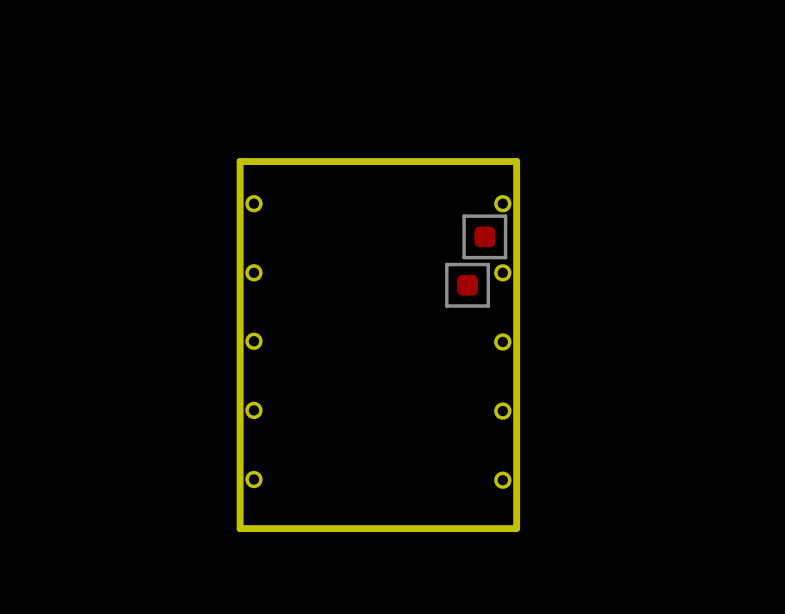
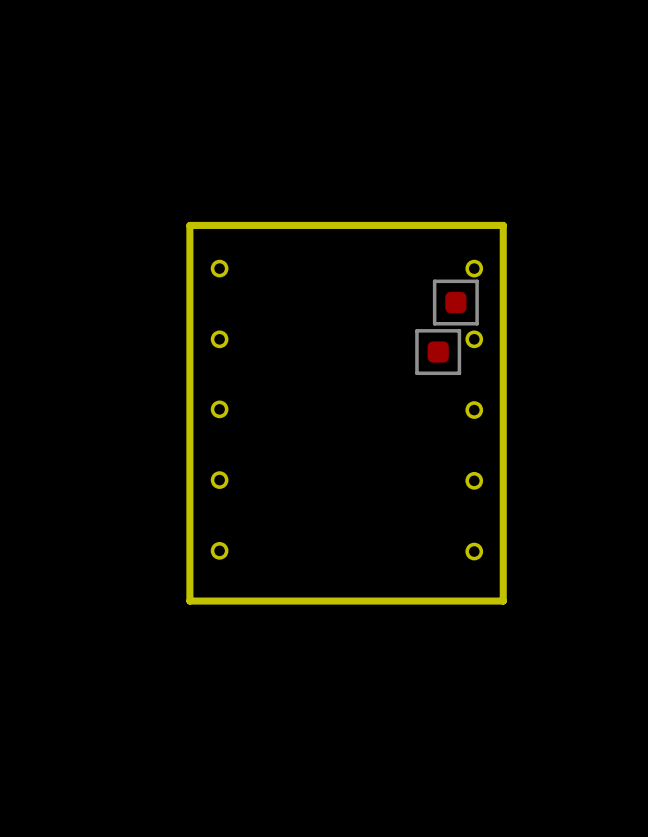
board edge: (240, 161) (240, 528) -> (205, 225) (189, 225) (189, 601) (205, 601)
board edge: (516, 161) (516, 528) -> (488, 225) (503, 225) (503, 601) (488, 601)

